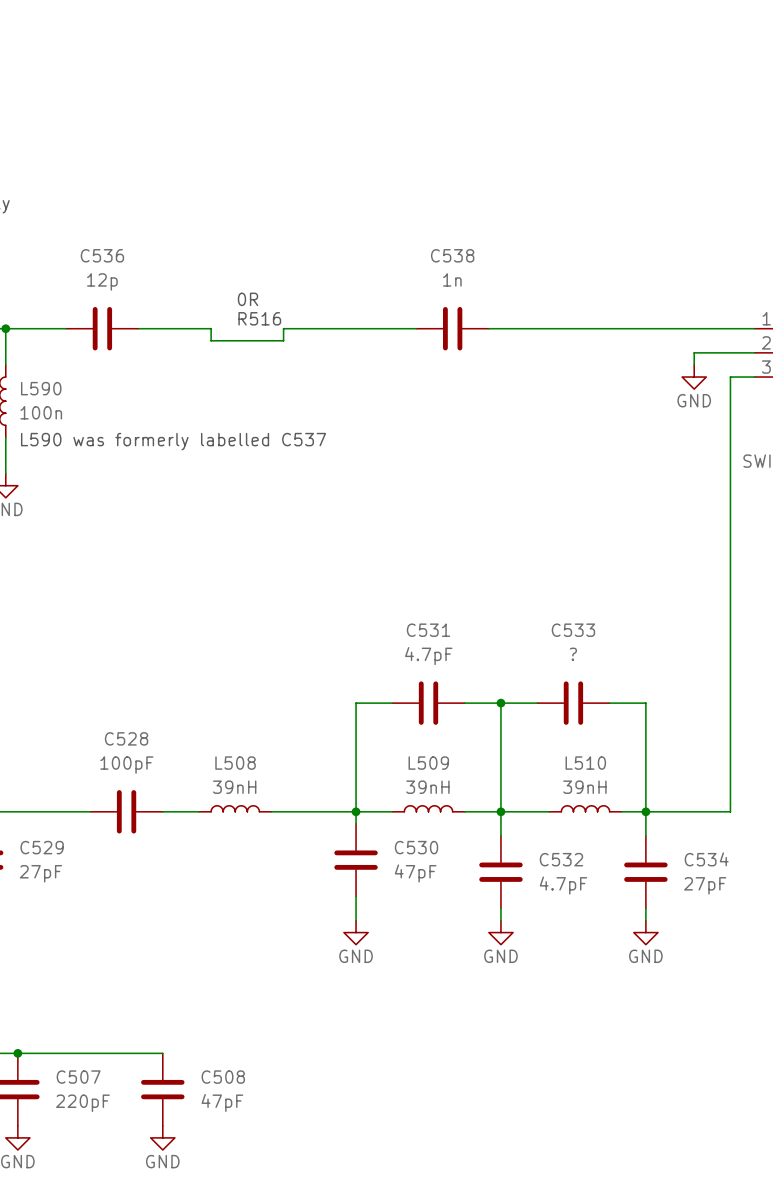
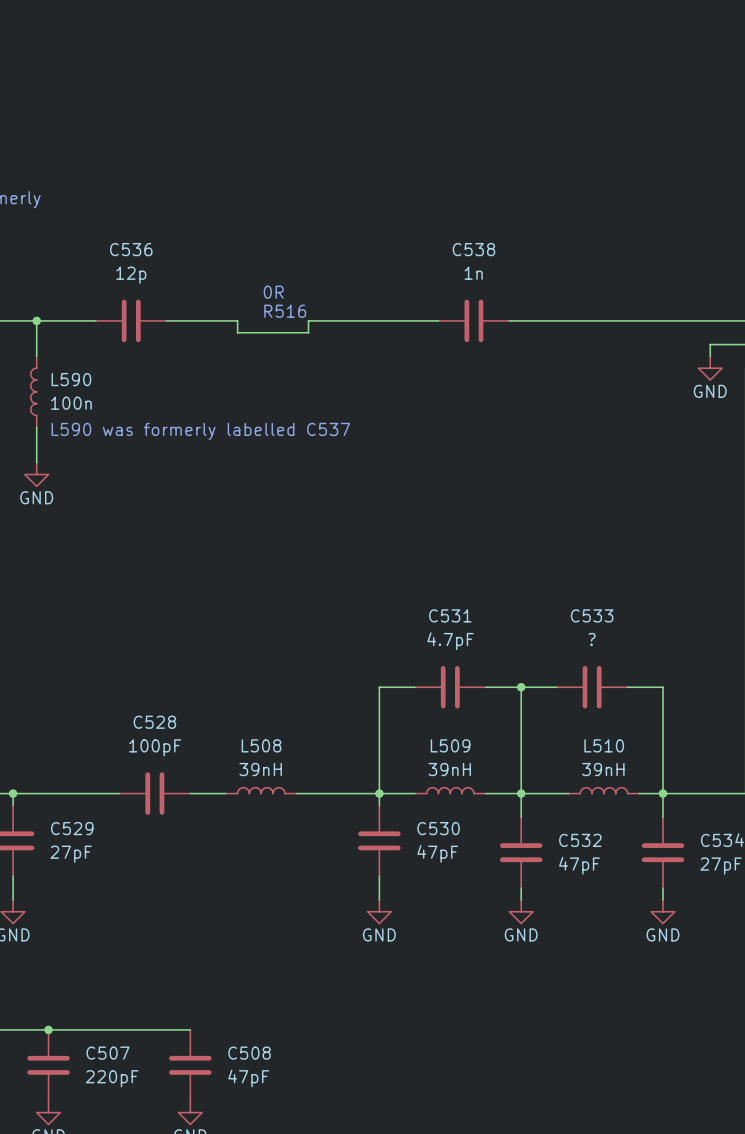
C532 value: 4.7pF (563, 885) -> 47pF (579, 865)

